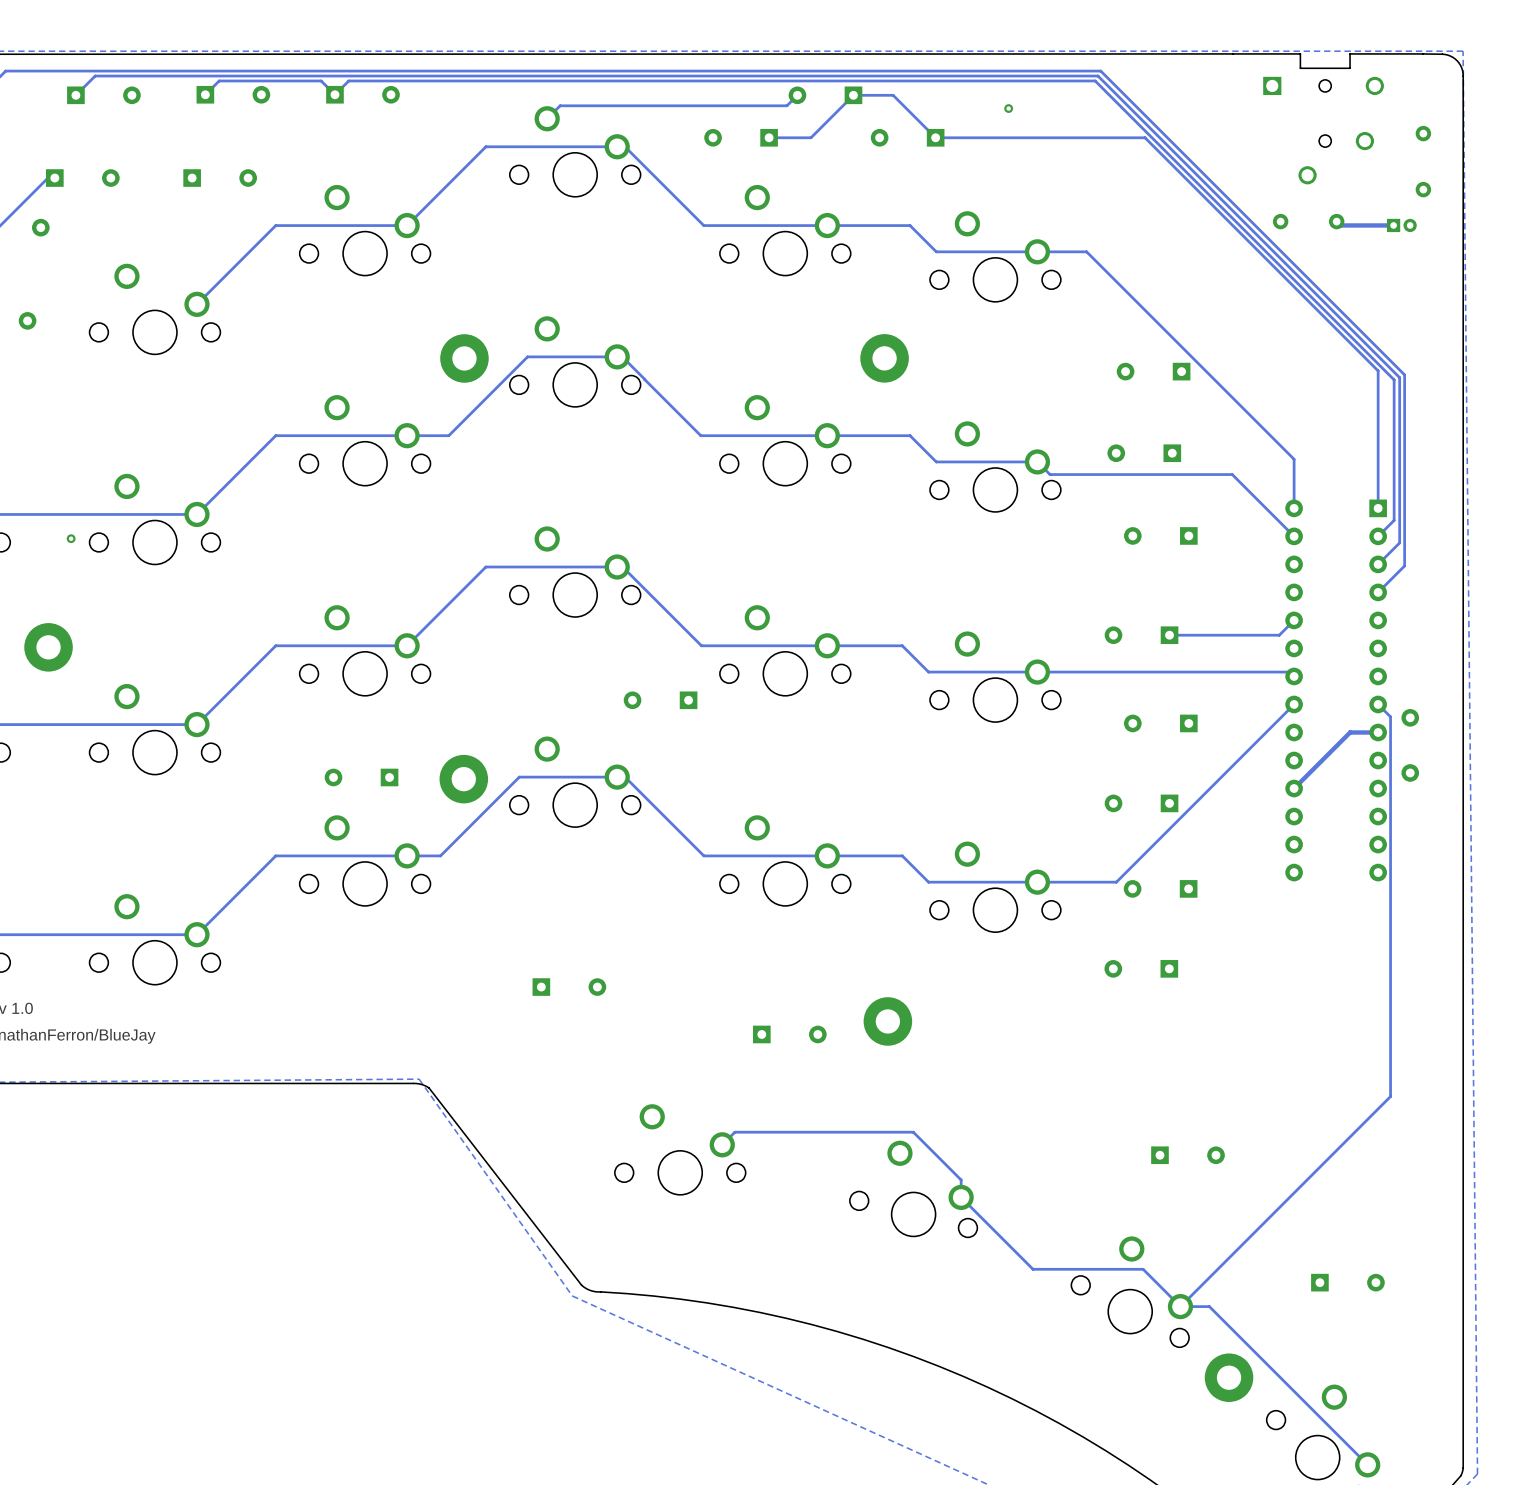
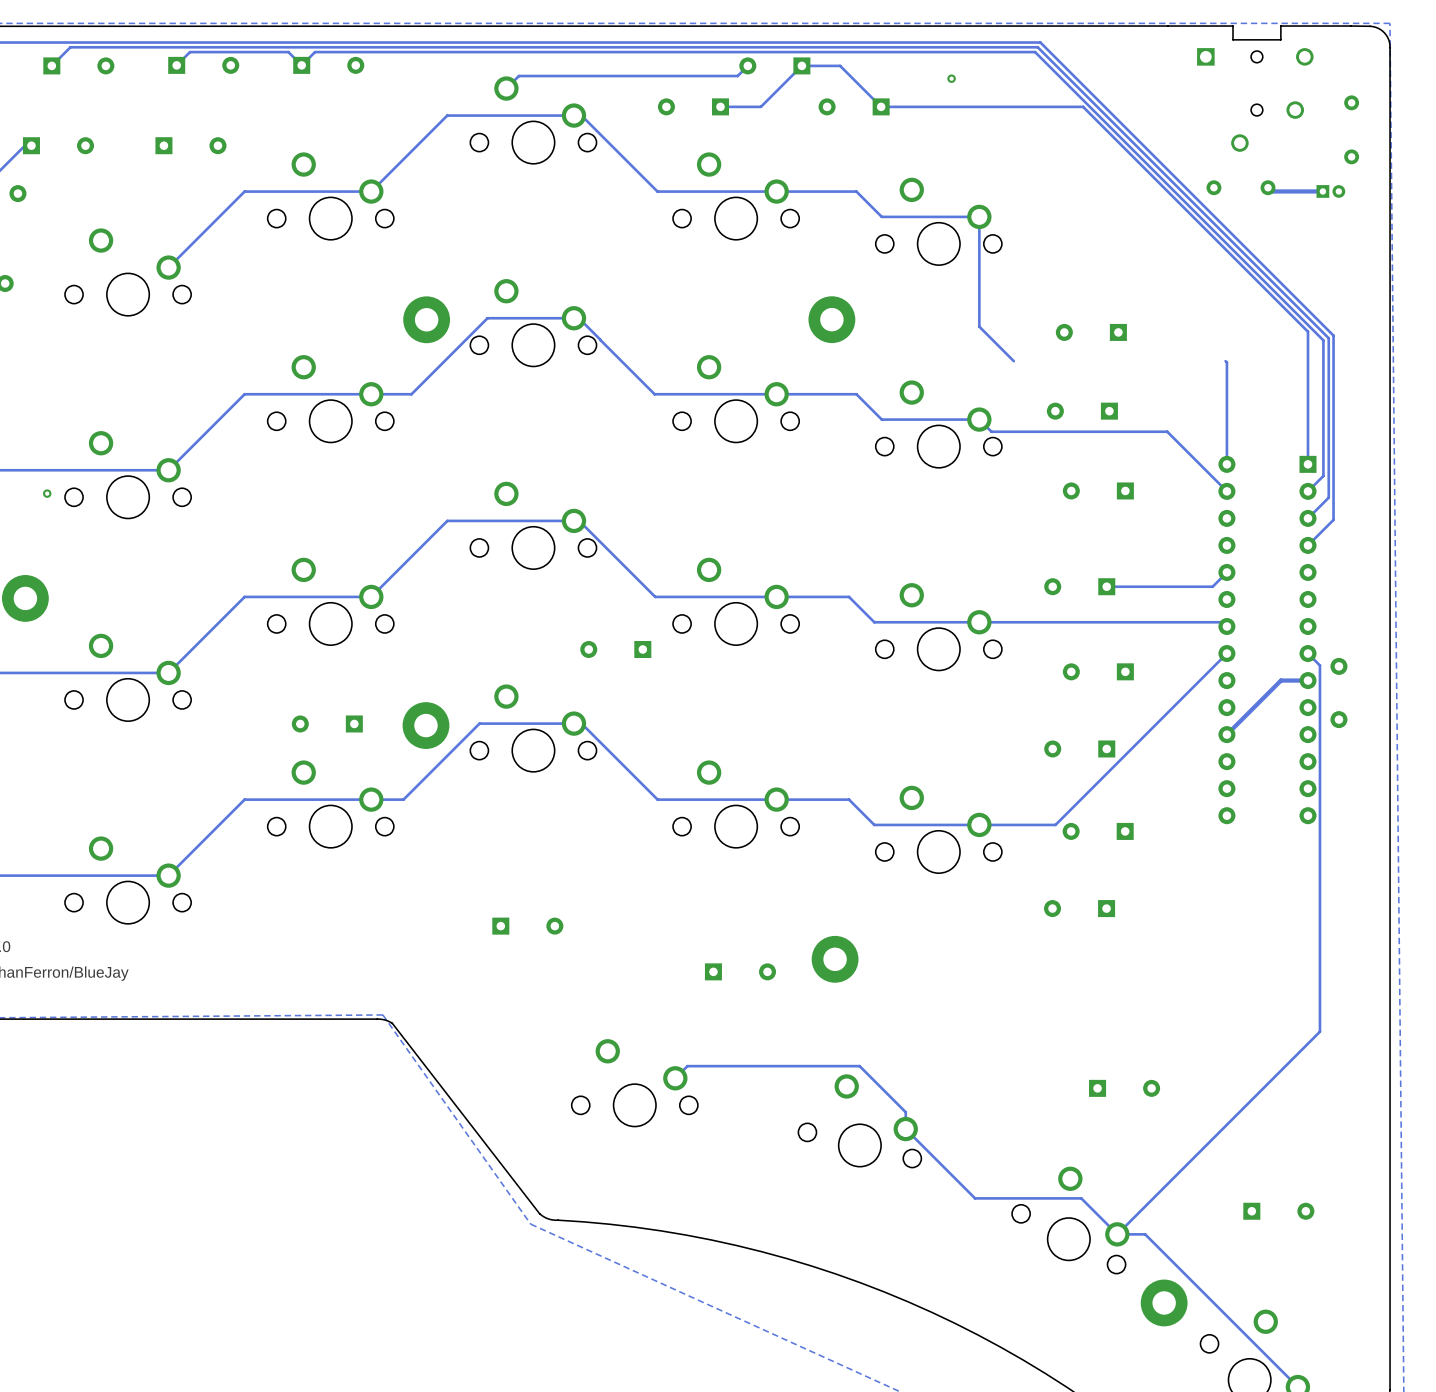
track: (1037, 251) (1086, 251) (1294, 459) -> (979, 216) (979, 326) (1013, 361)
track: none -> (1225, 361) (1226, 417)

